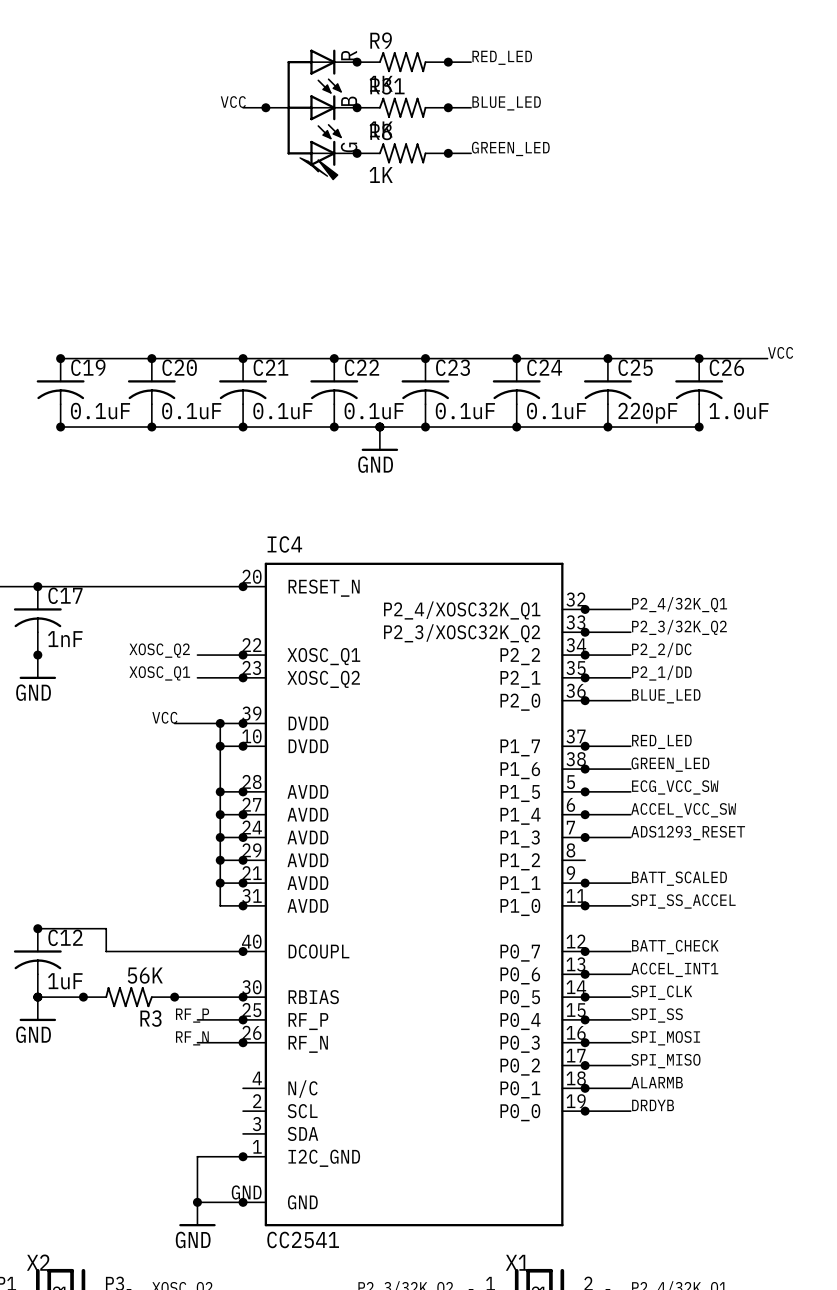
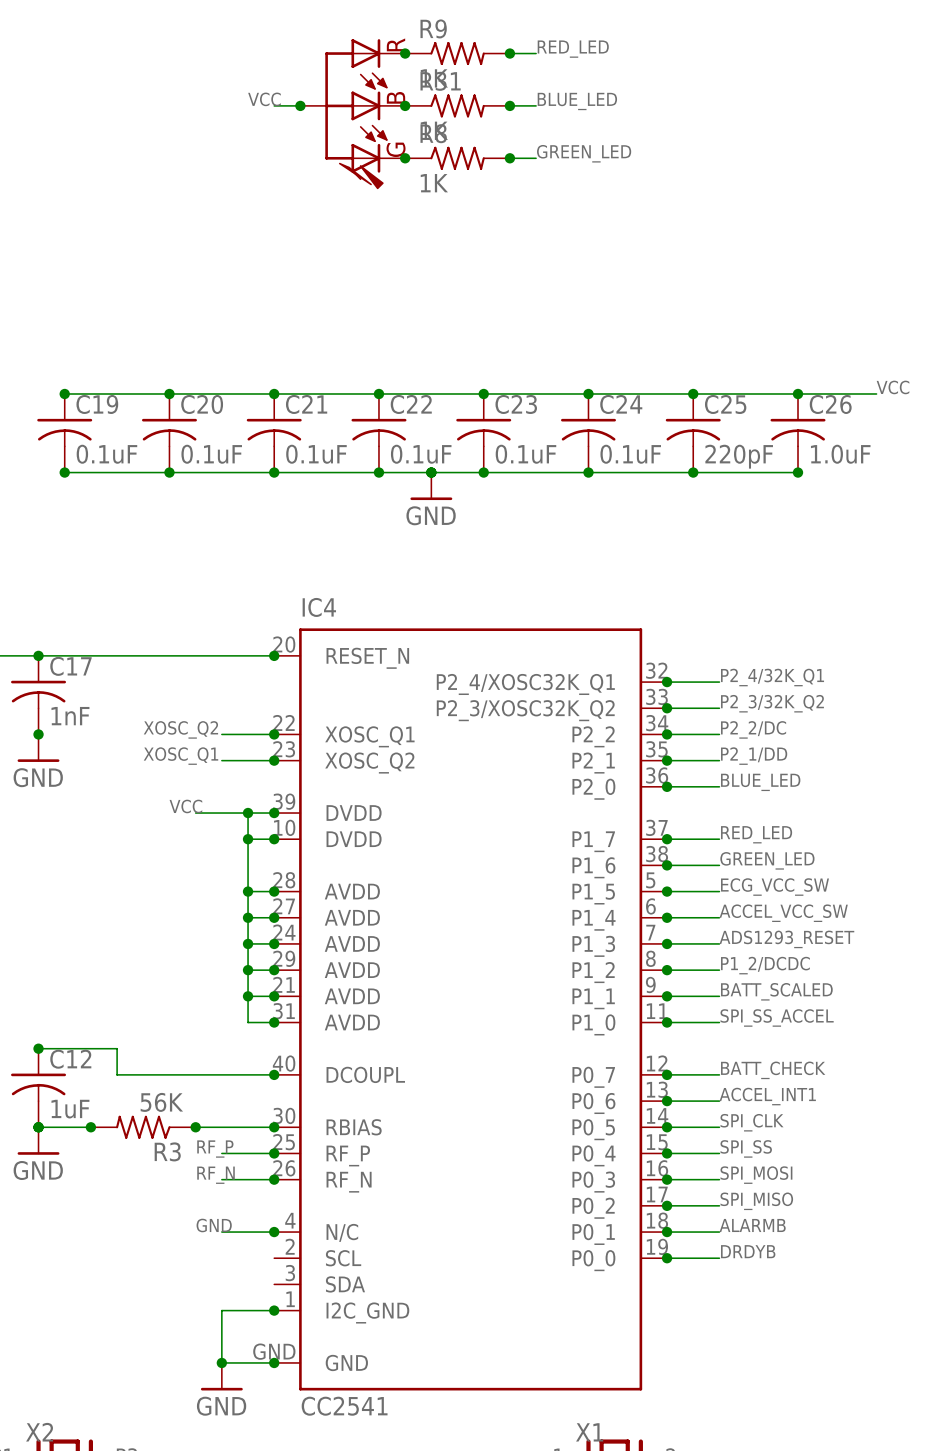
label: none -> P1_2/DCDC (765, 965)
wire: none -> (667, 970) (719, 970)
junction: none -> (667, 970)
label: none -> GND (214, 1225)
wire: none -> (221, 1232) (274, 1232)
junction: none -> (274, 1232)

